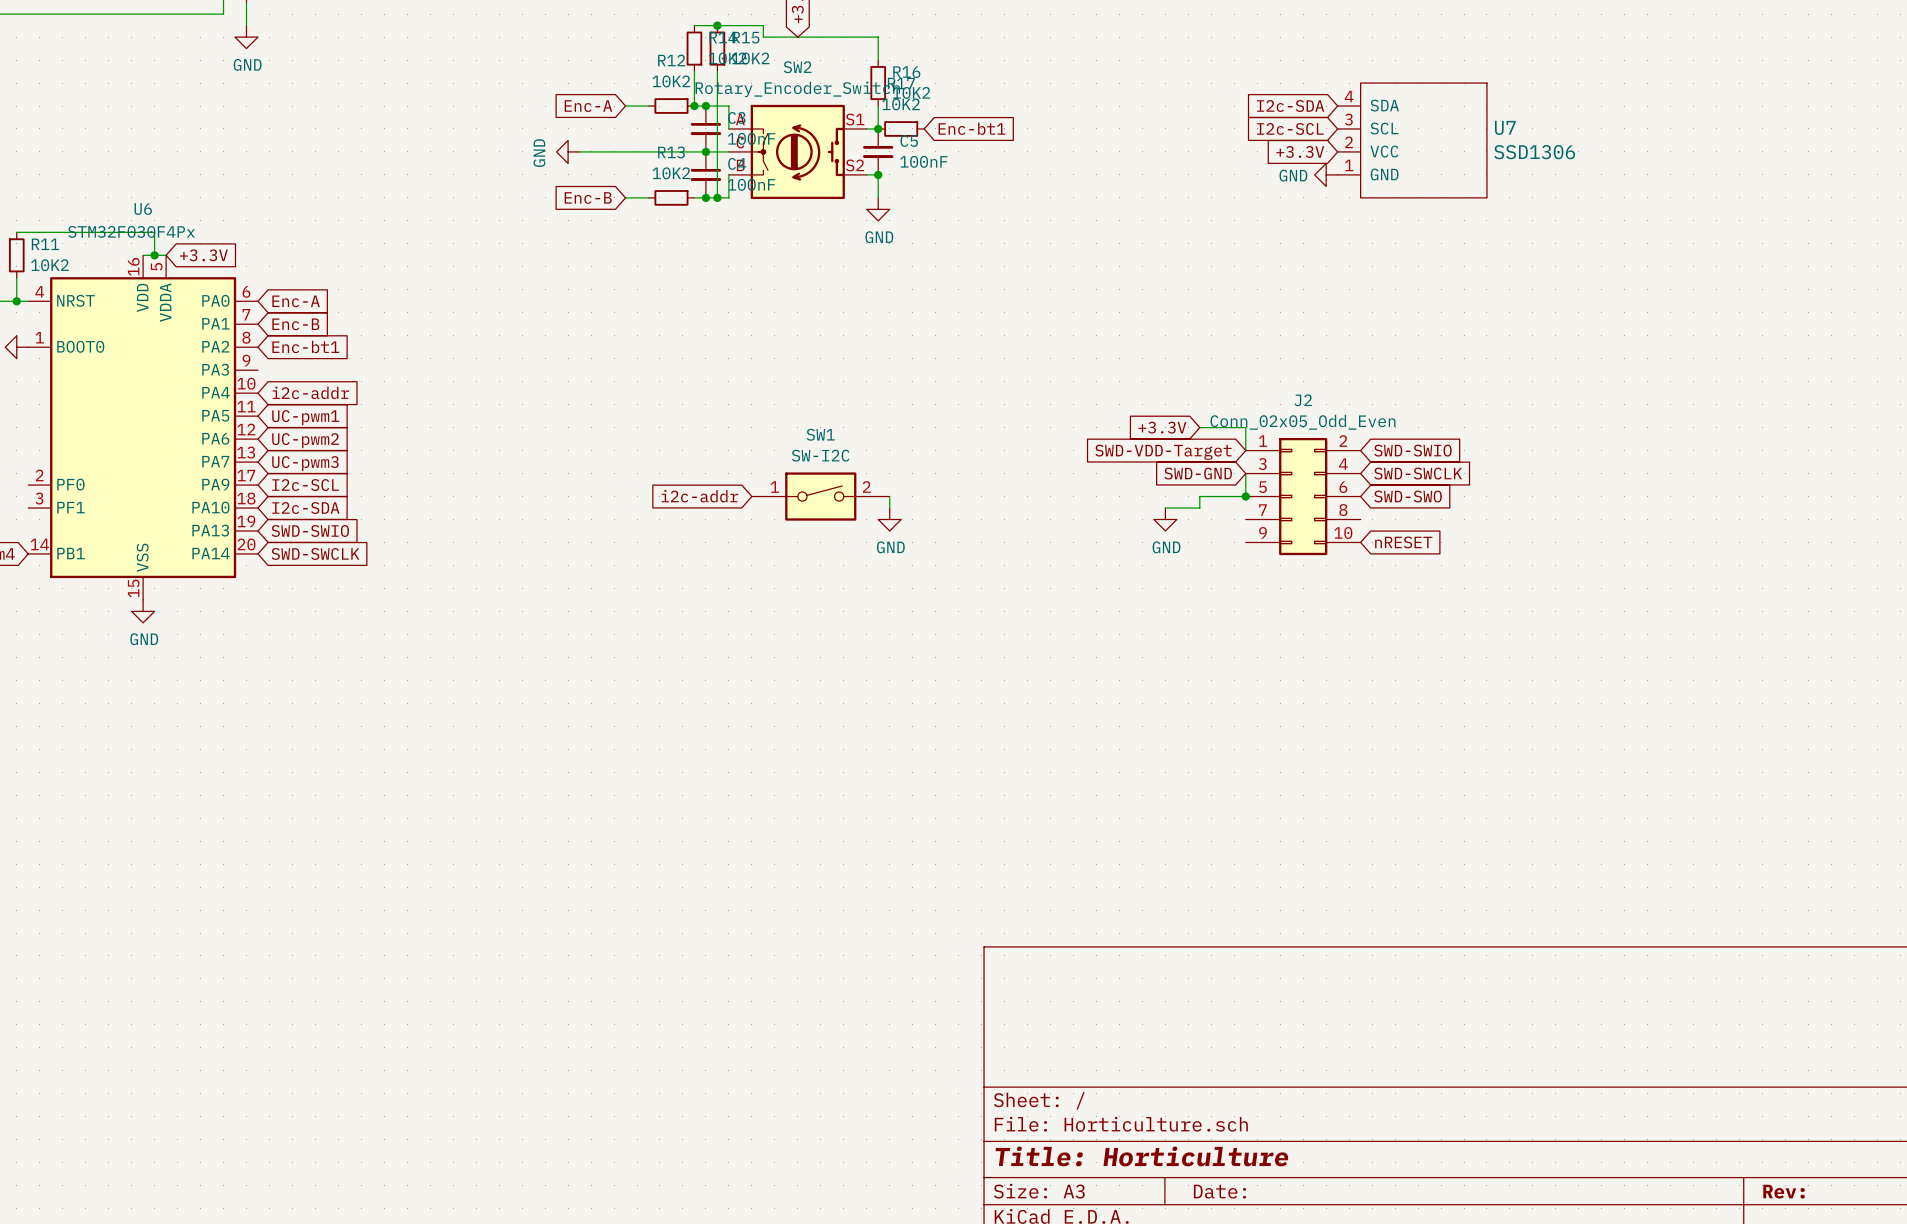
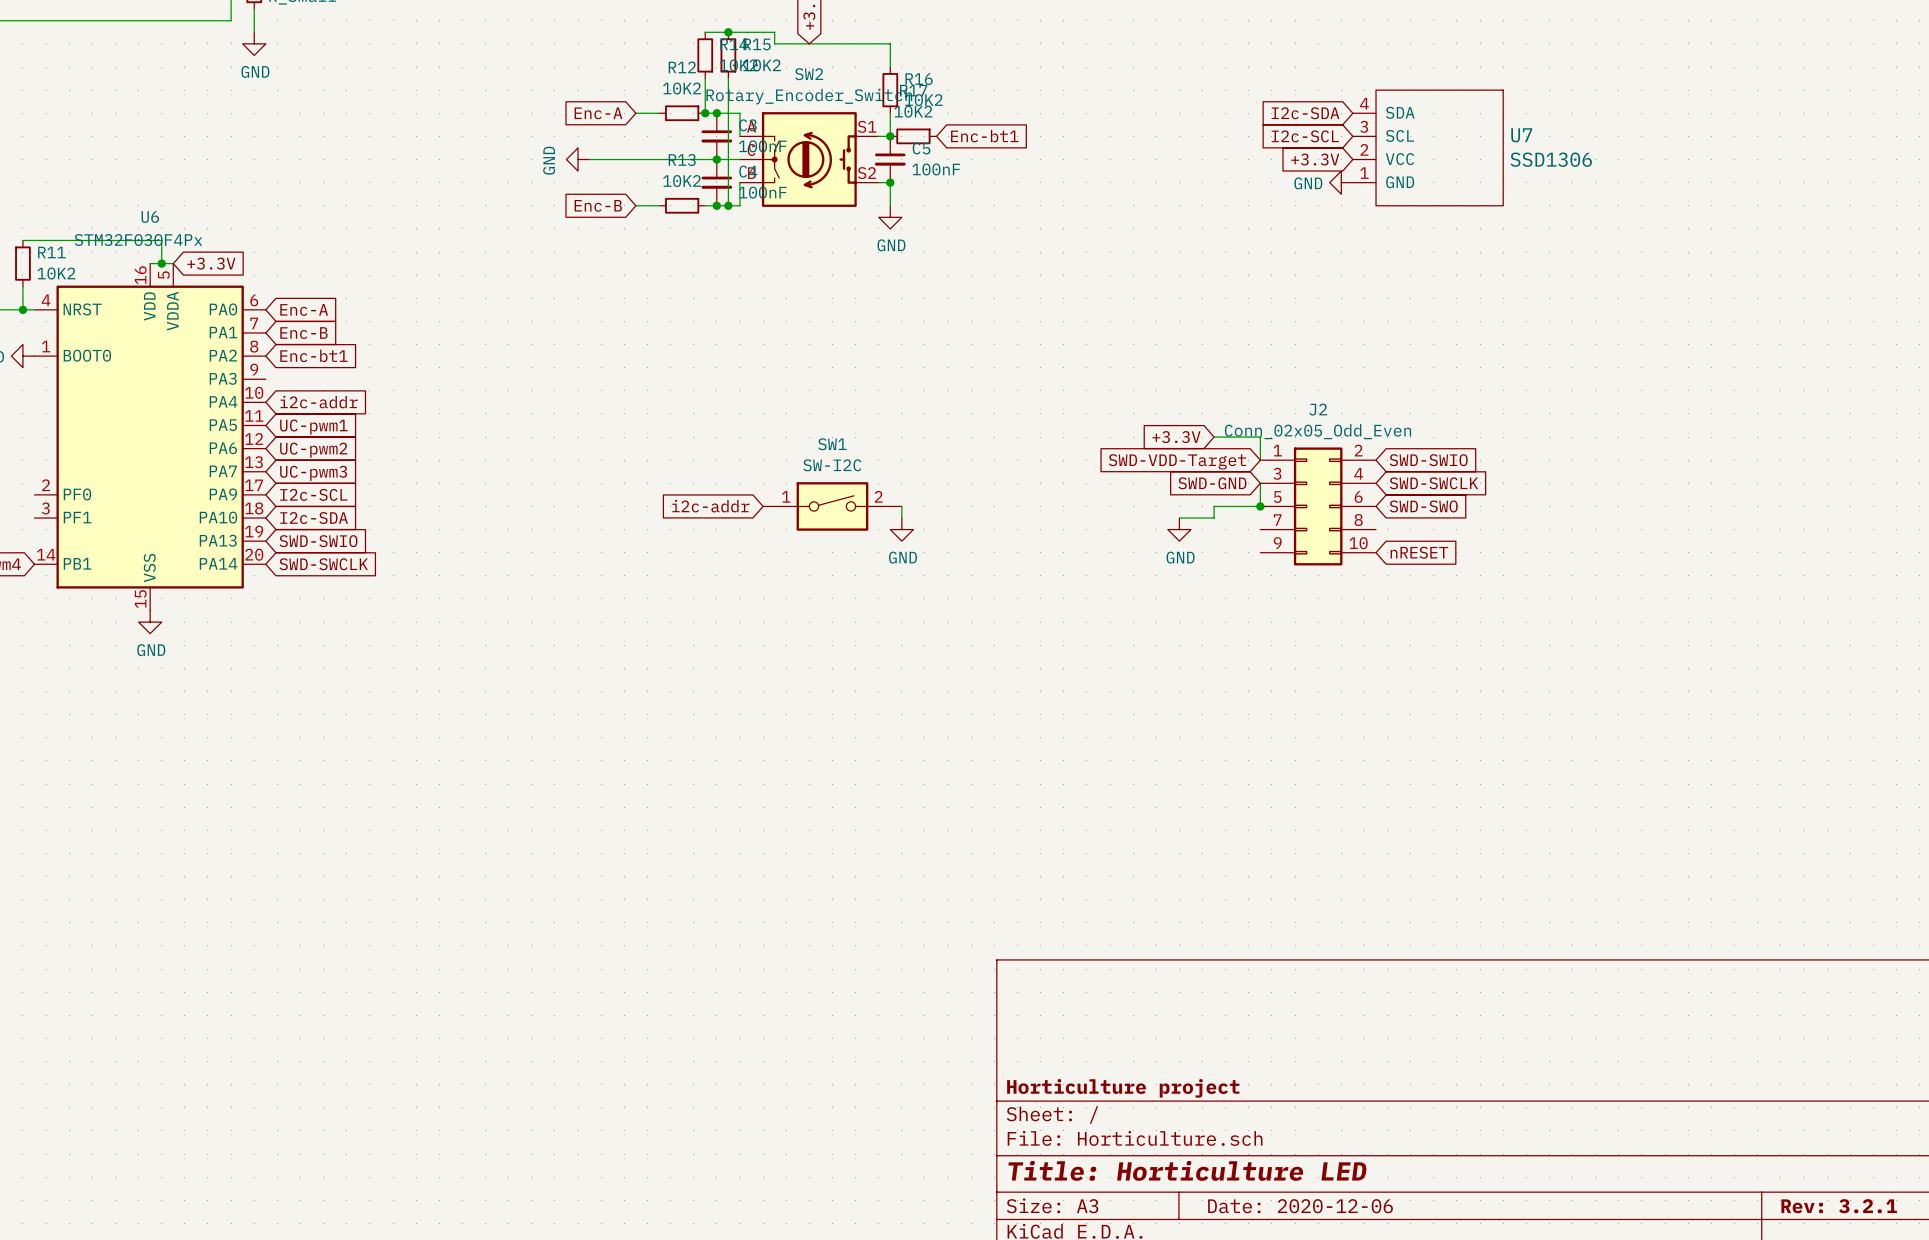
title block: none -> Horticulture project (1123, 1088)
title block: Title: Horticulture (1141, 1156) -> Title: Horticulture LED (1187, 1170)
title block: Date: (1219, 1191) -> Date: 2020-12-06 (1300, 1206)
title block: Rev: (1783, 1191) -> Rev: 3.2.1 (1839, 1206)

